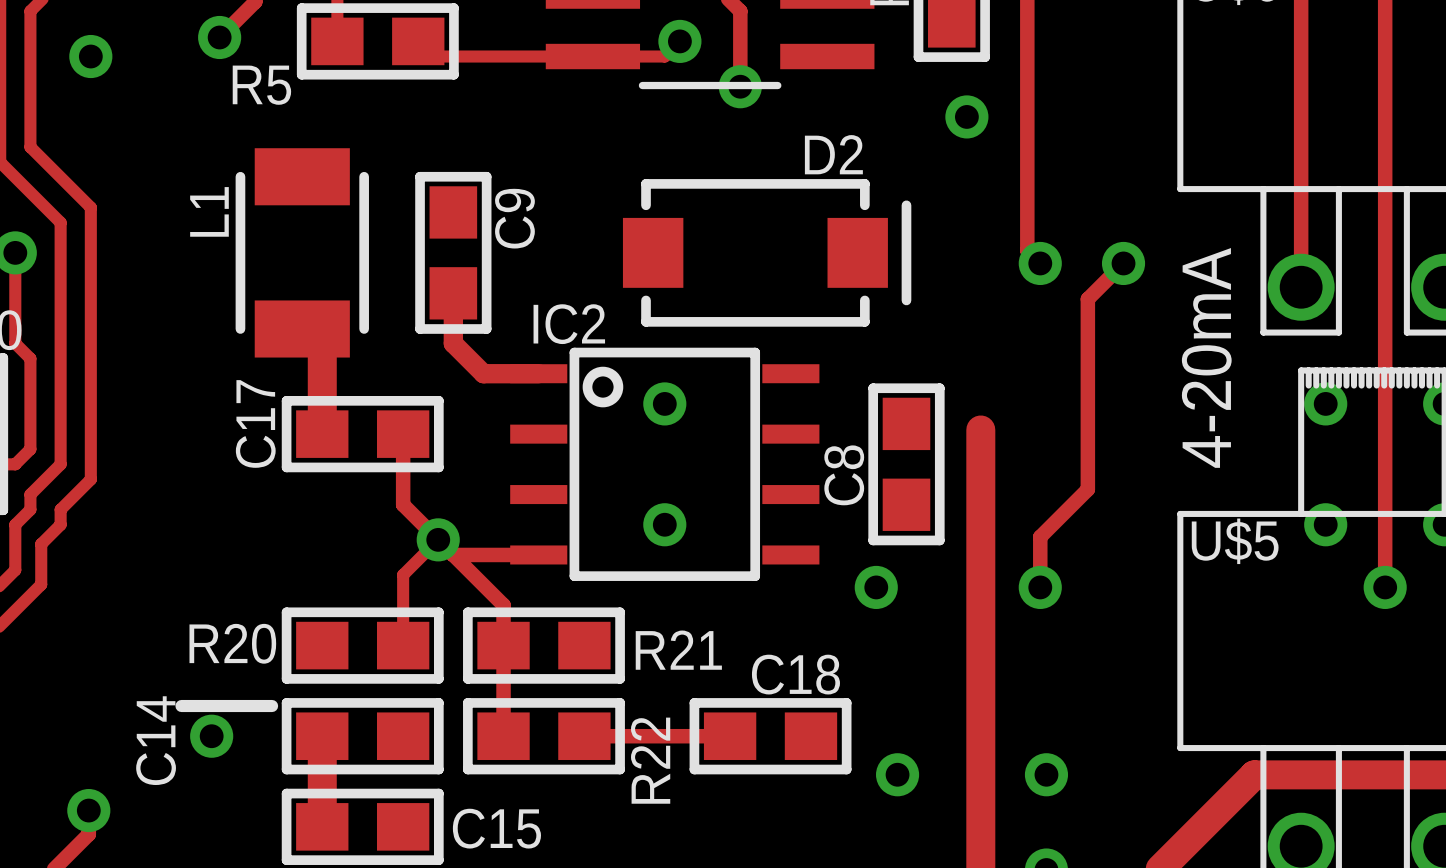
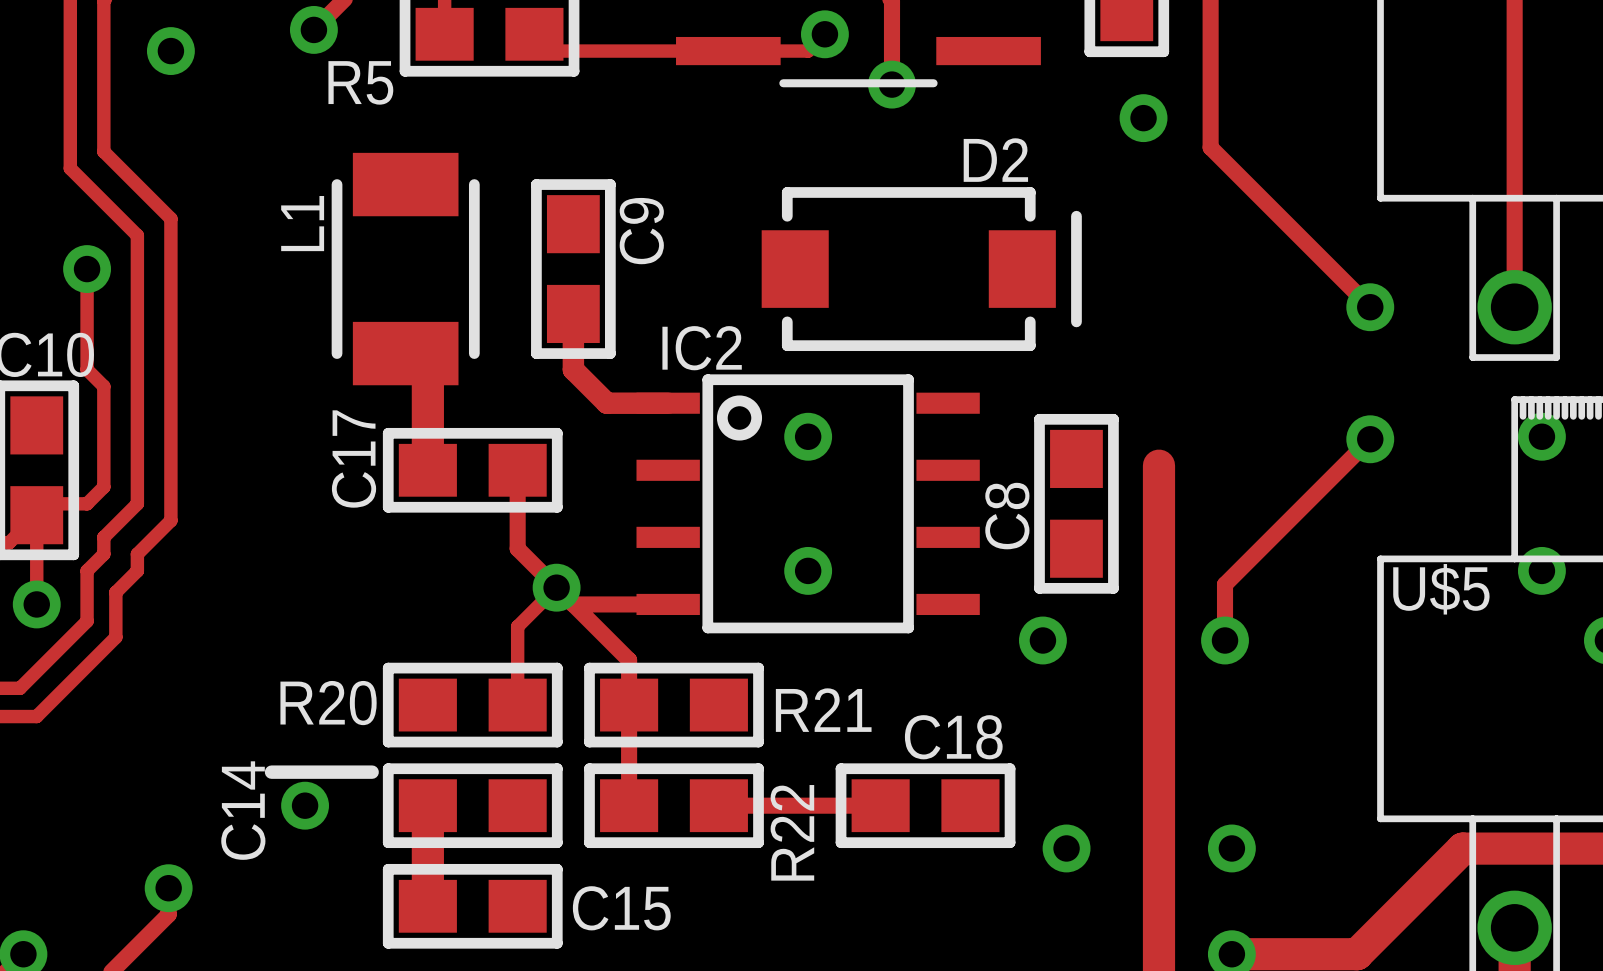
track: (1027, 143) (1027, 250) (1040, 263) -> (1210, 147) (1370, 307)
via: (1040, 263) -> none
track: (1123, 263) (1087, 299) (1087, 489) -> (1370, 439) (1277, 531)
via position: (1123, 263) -> (1370, 307)
text: 4-20mA (1206, 357) -> none
via: none -> (1370, 439)

